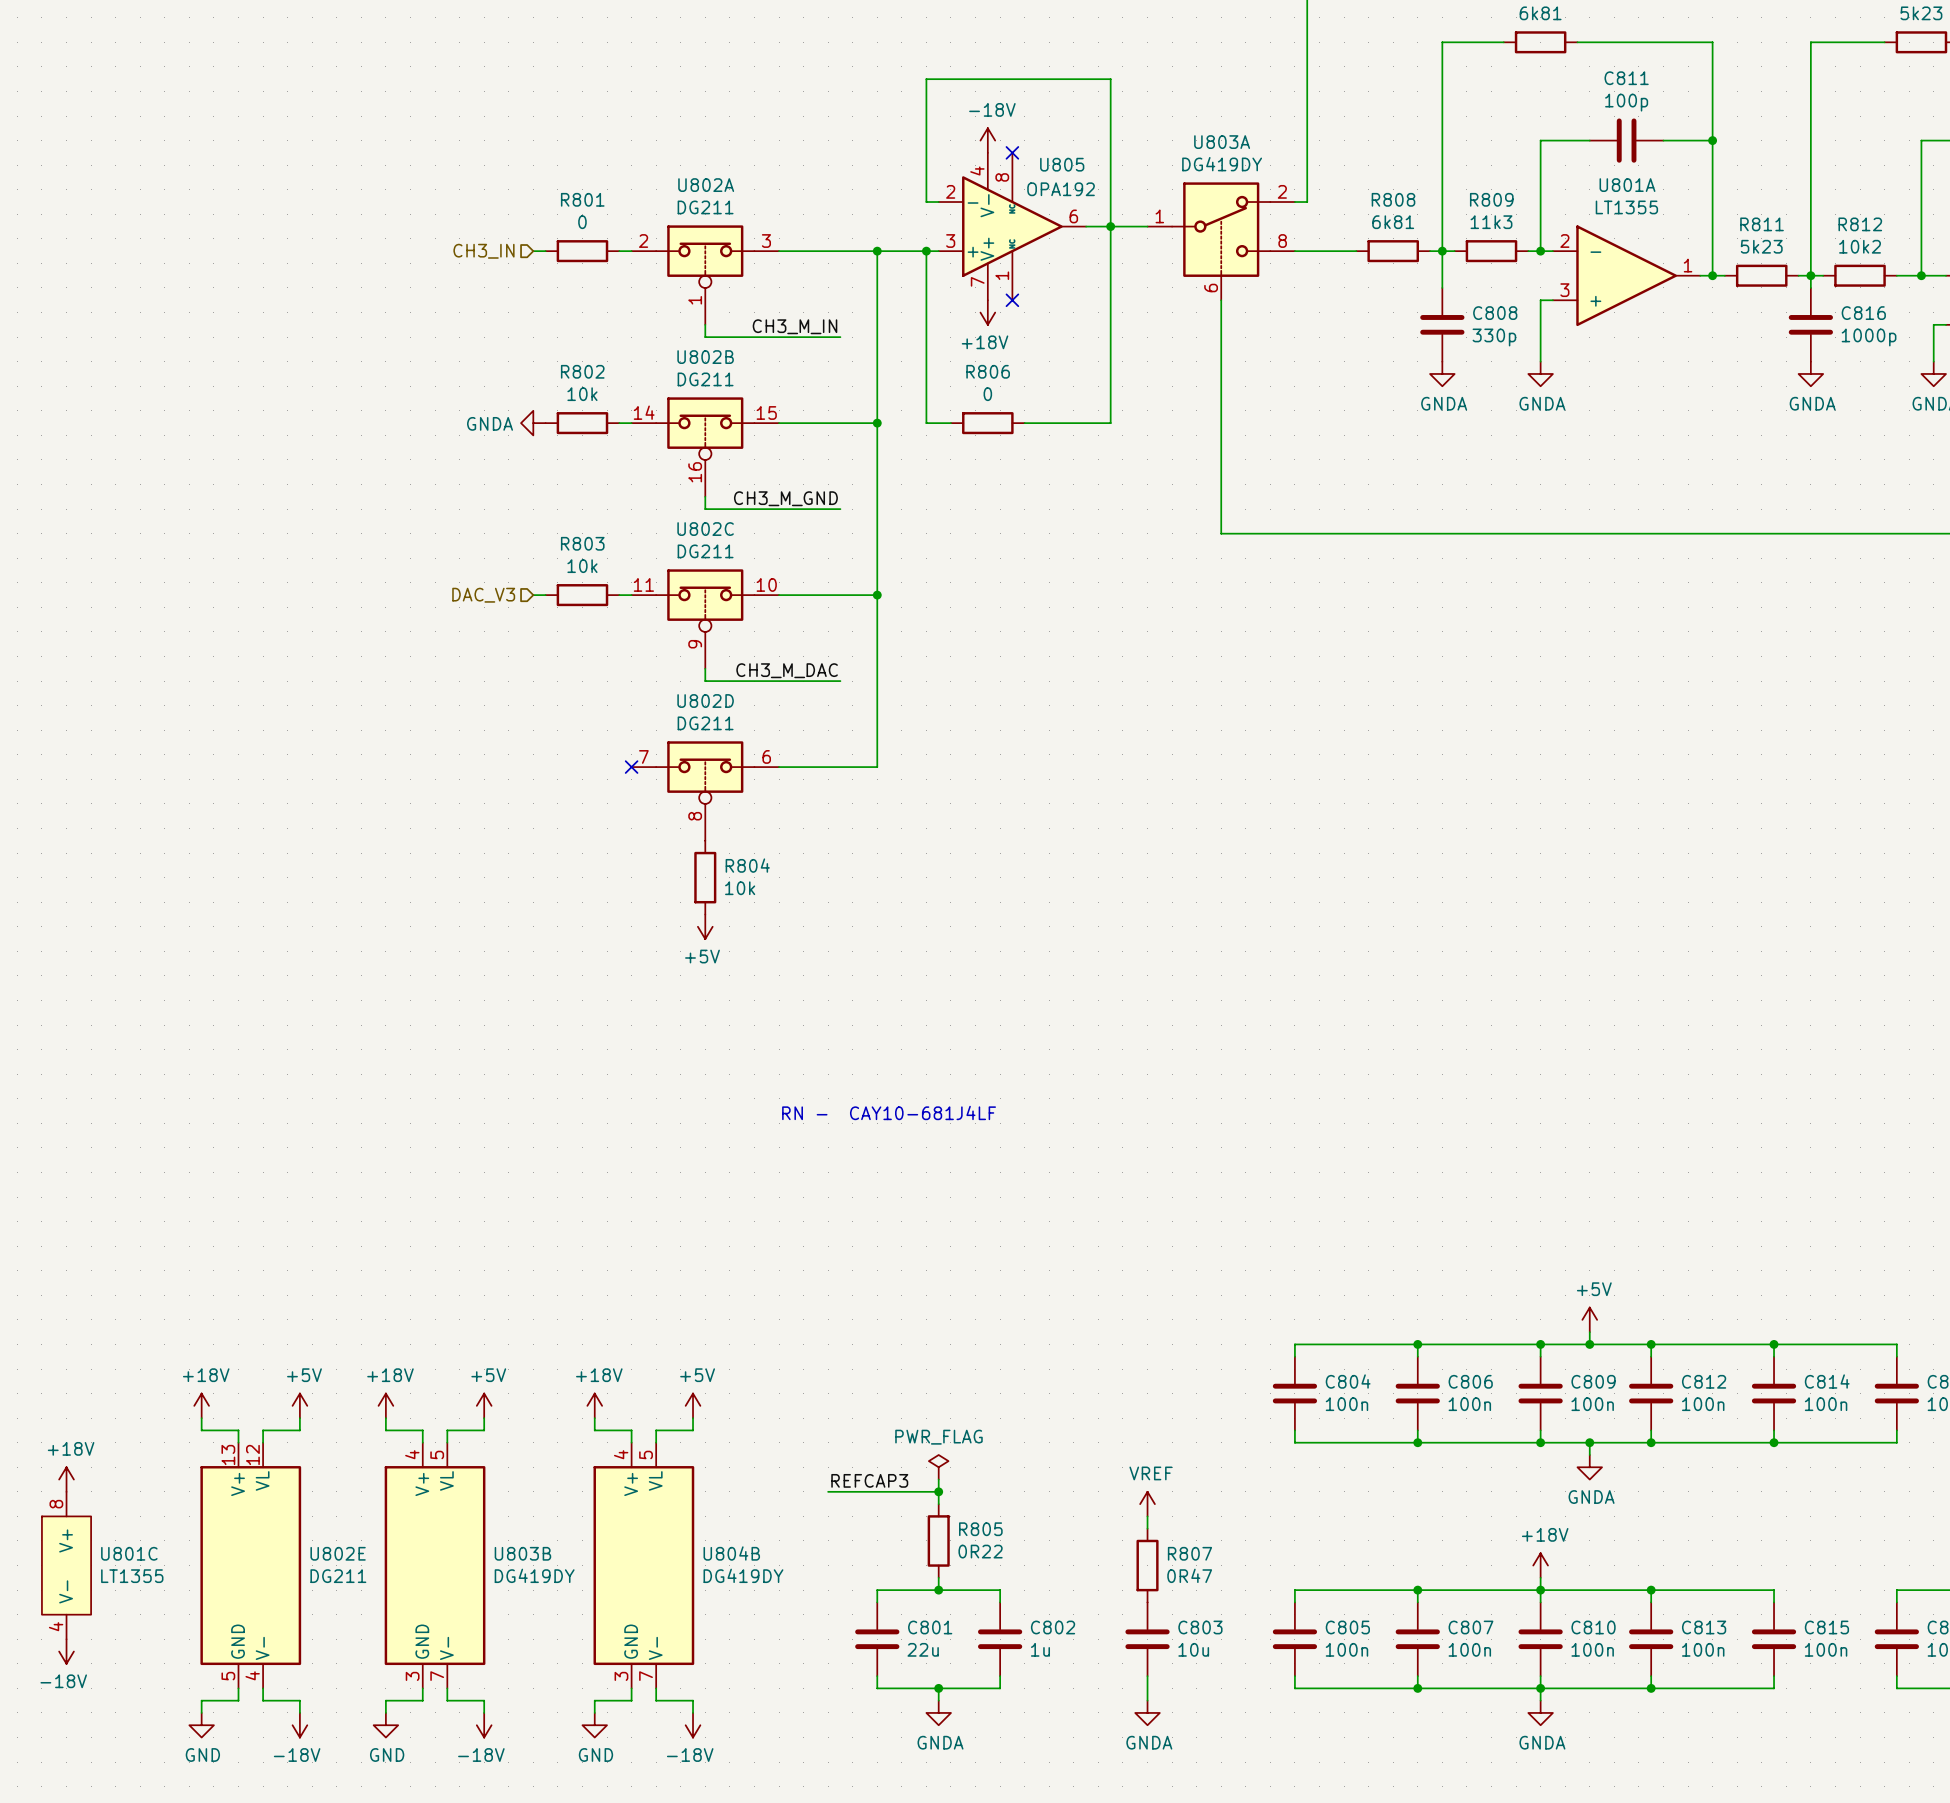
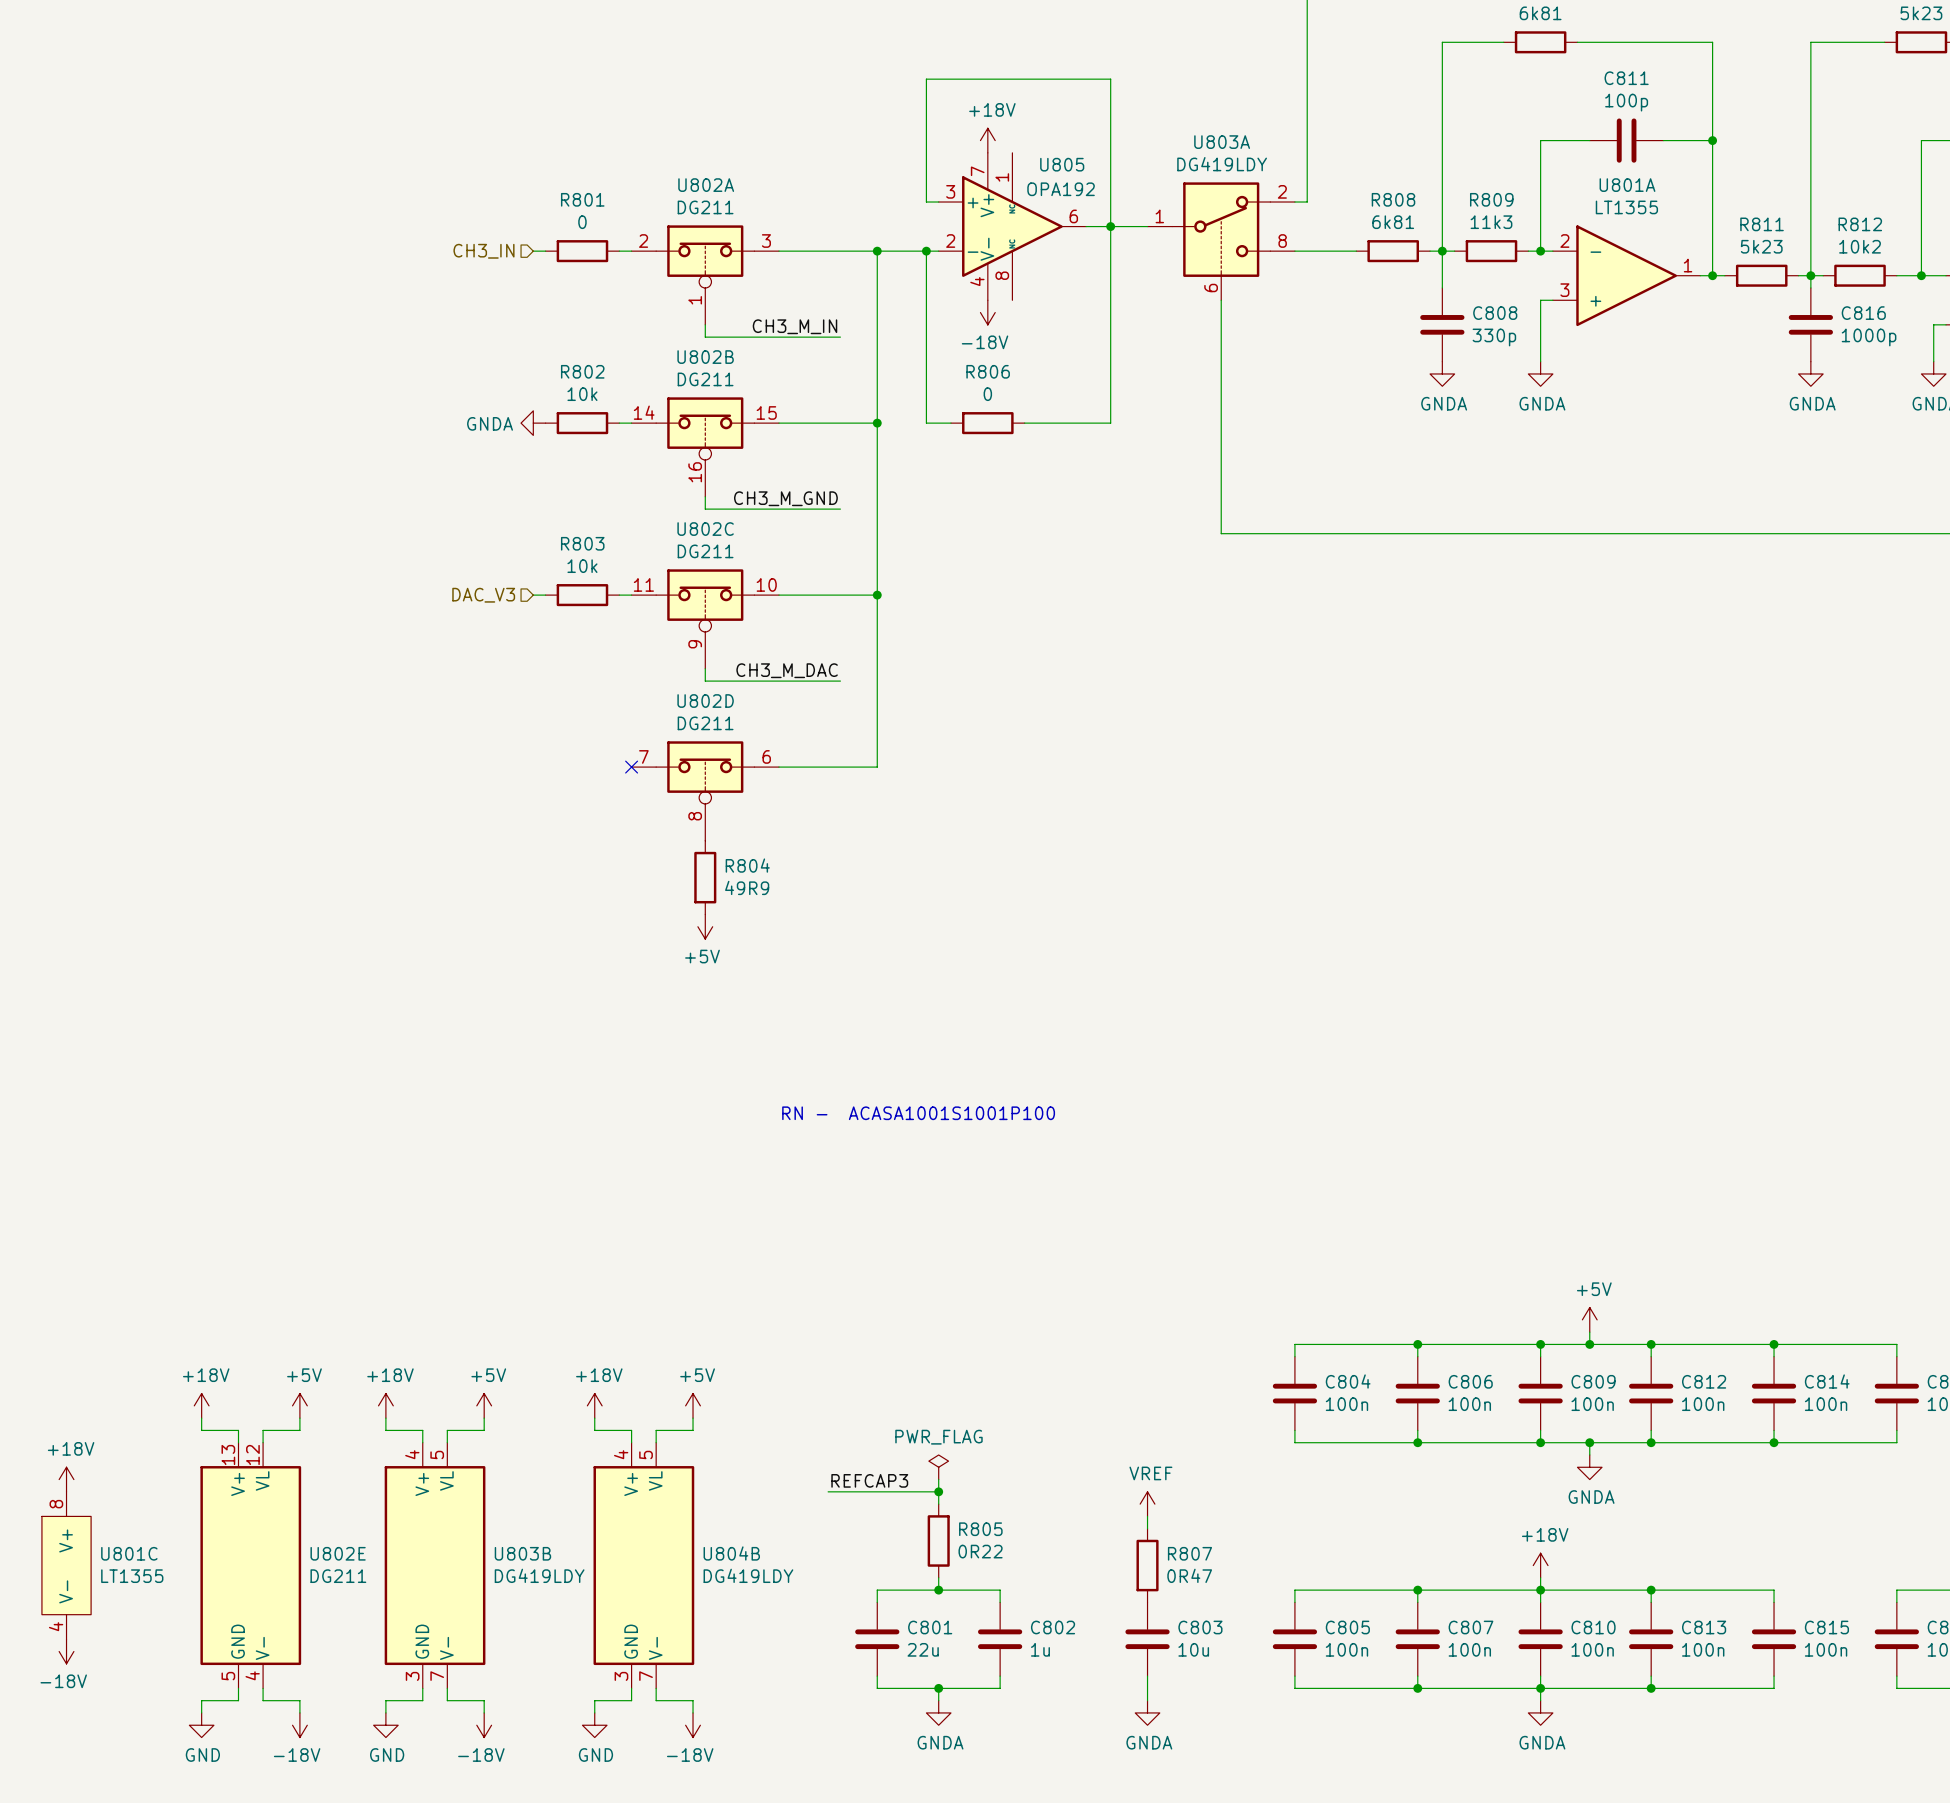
power symbol: -18V (987, 140) -> +18V (987, 140)
no-connect mark: (1012, 152) -> none
U803A value: DG419DY (1222, 164) -> DG419LDY (1222, 164)
U805 flip: as is (1012, 226) -> up-down (1012, 226)
no-connect mark: (1012, 300) -> none
power symbol: +18V (987, 312) -> -18V (987, 312)
R804 value: 10k (740, 888) -> 49R9 (747, 887)
text: RN - CAY10-681J4LF (889, 1112) -> RN - ACASA1001S1001P100 (918, 1113)
U803B value: DG419DY (534, 1575) -> DG419LDY (539, 1575)
U804B value: DG419DY (743, 1575) -> DG419LDY (748, 1575)

